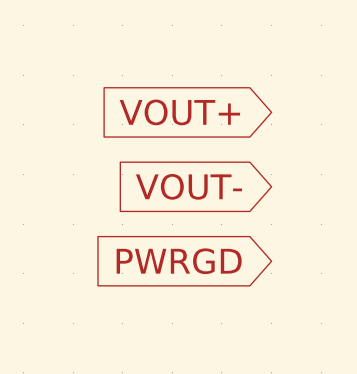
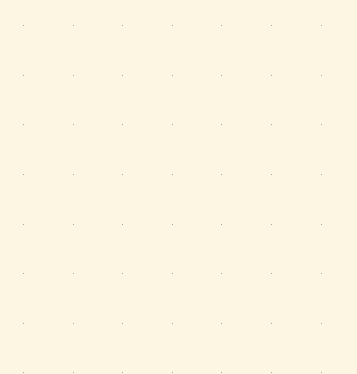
global label: VOUT+ (179, 112) -> none
global label: VOUT- (188, 186) -> none
global label: PWRGD (179, 261) -> none

